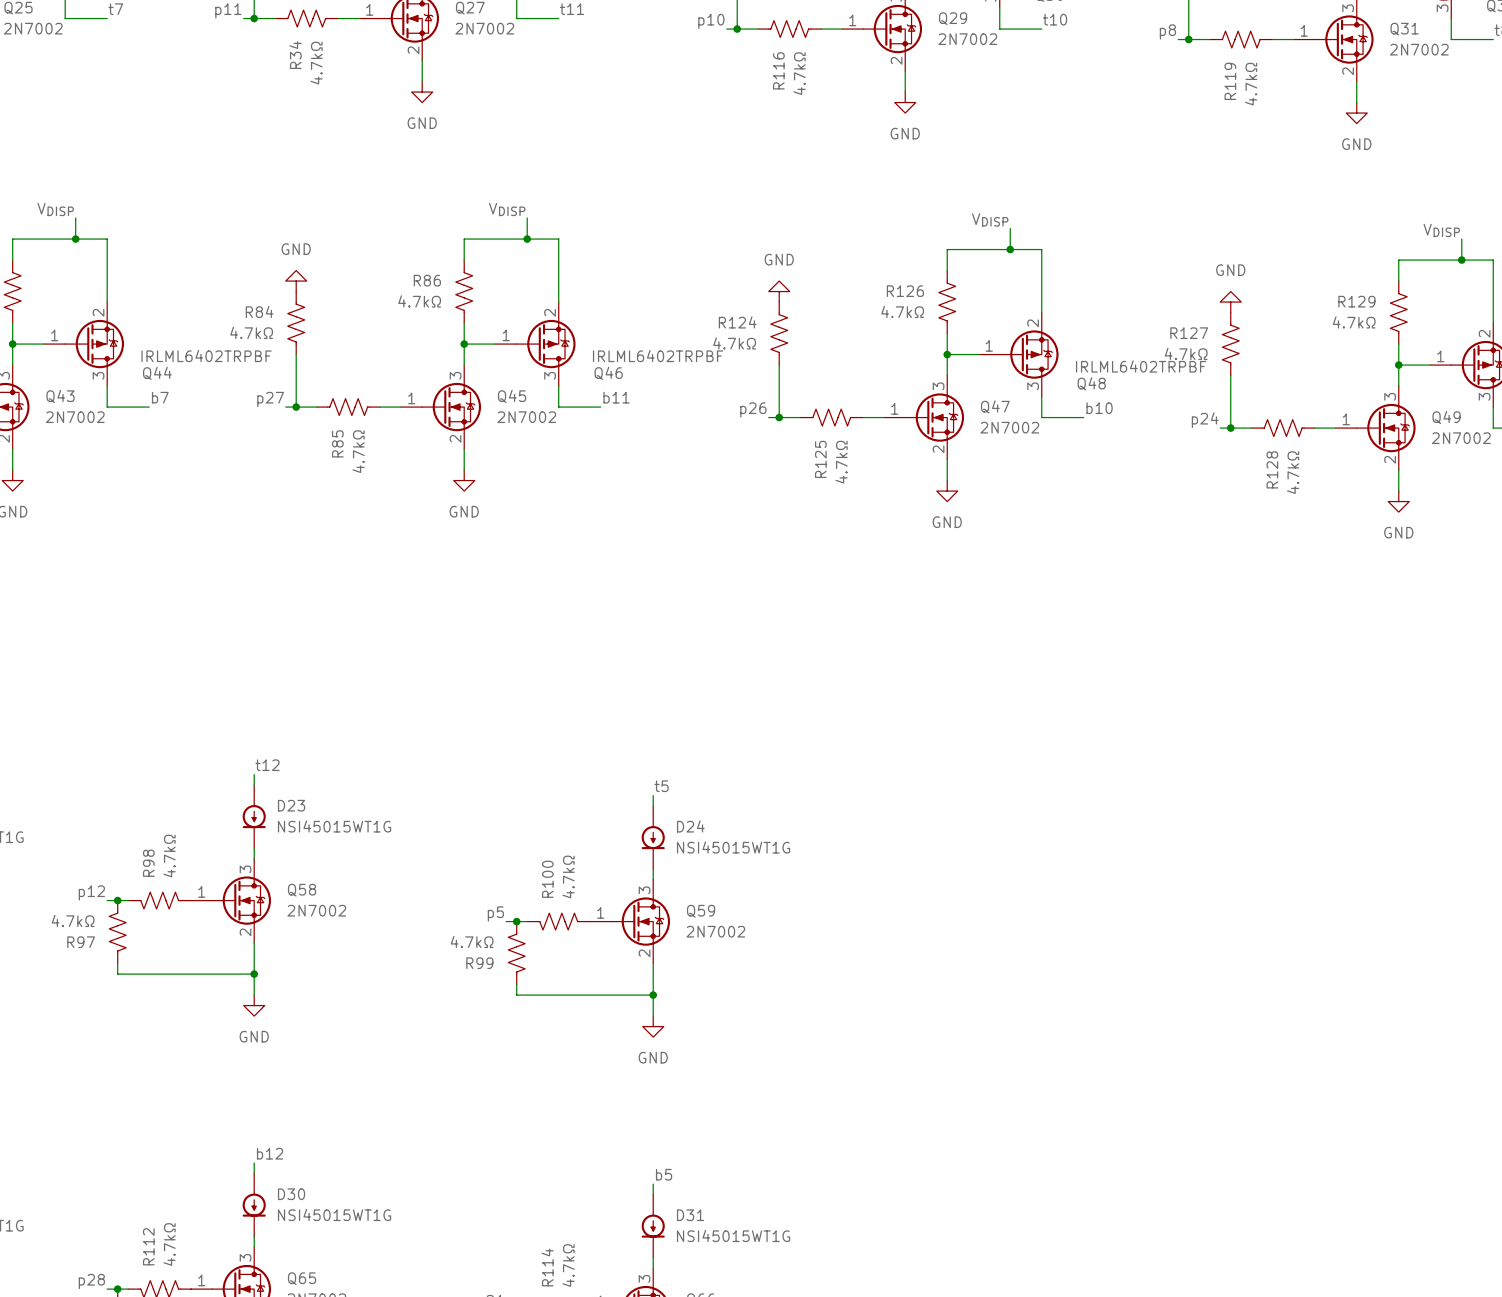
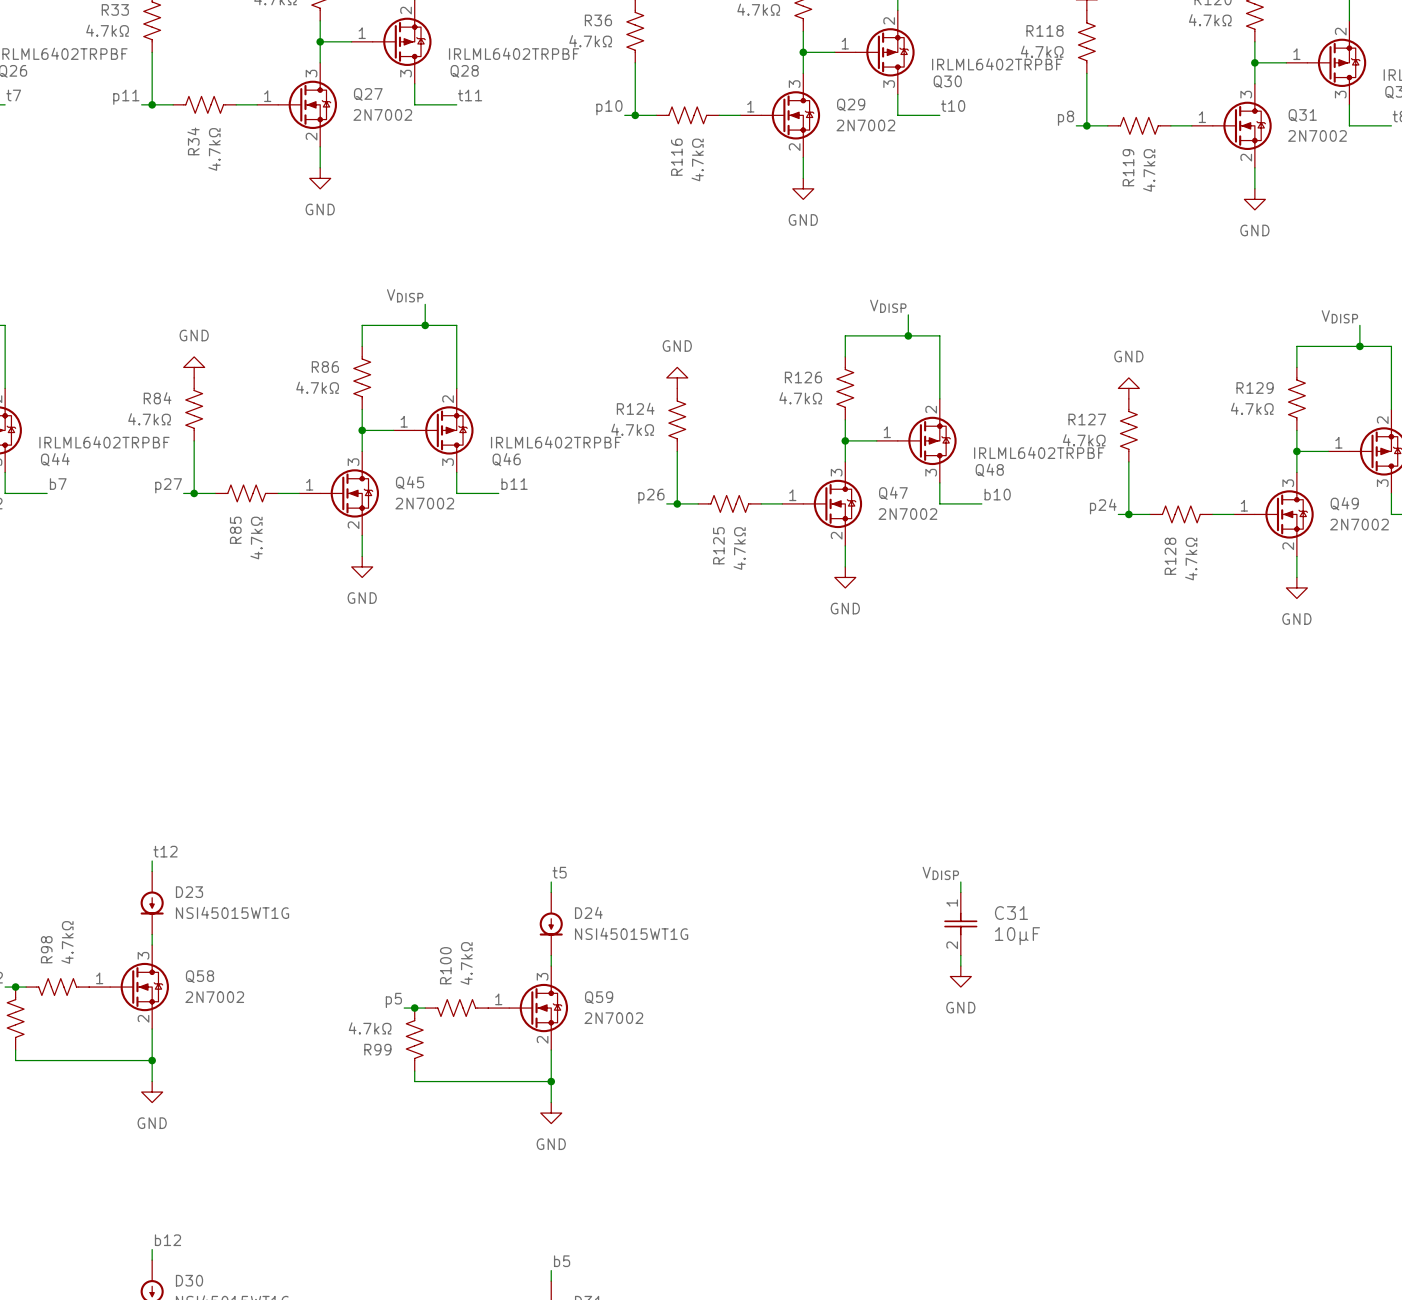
label: none -> VDISP (940, 873)
wire: none -> (960, 882) (960, 892)
C31: none -> 10µF (960, 924)
wire: none -> (960, 955) (960, 966)
power symbol: none -> GND (960, 976)

